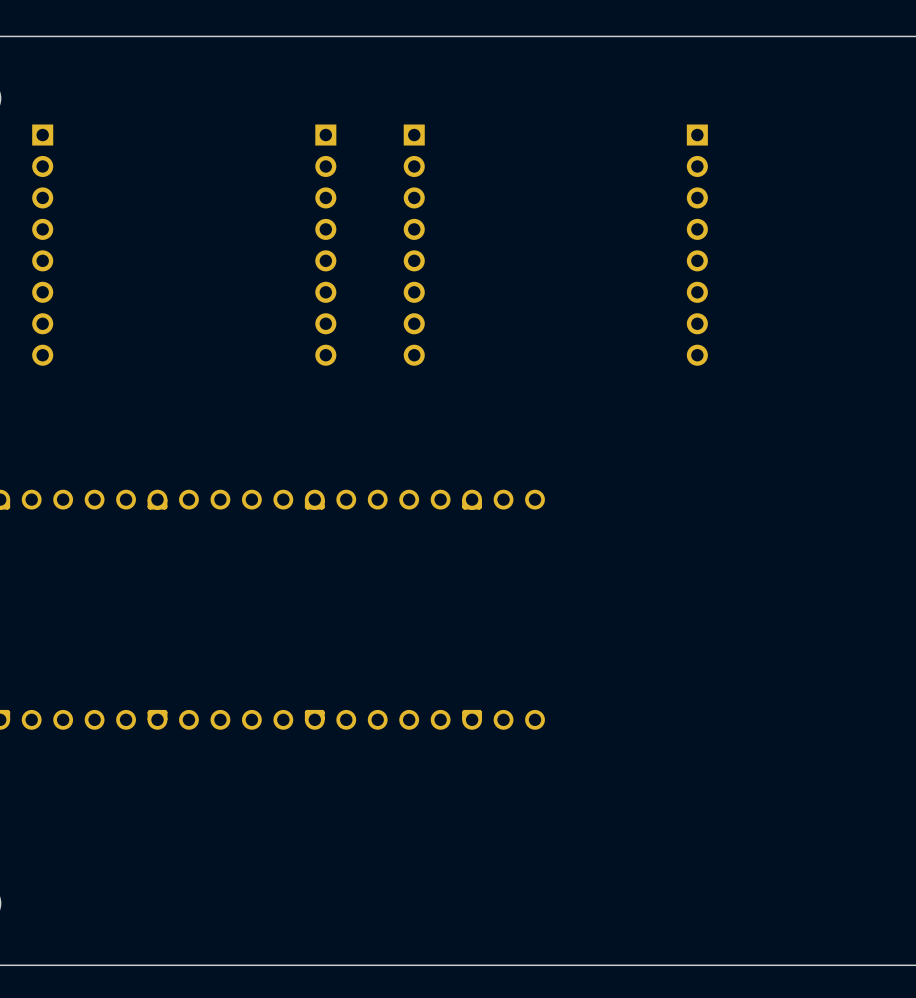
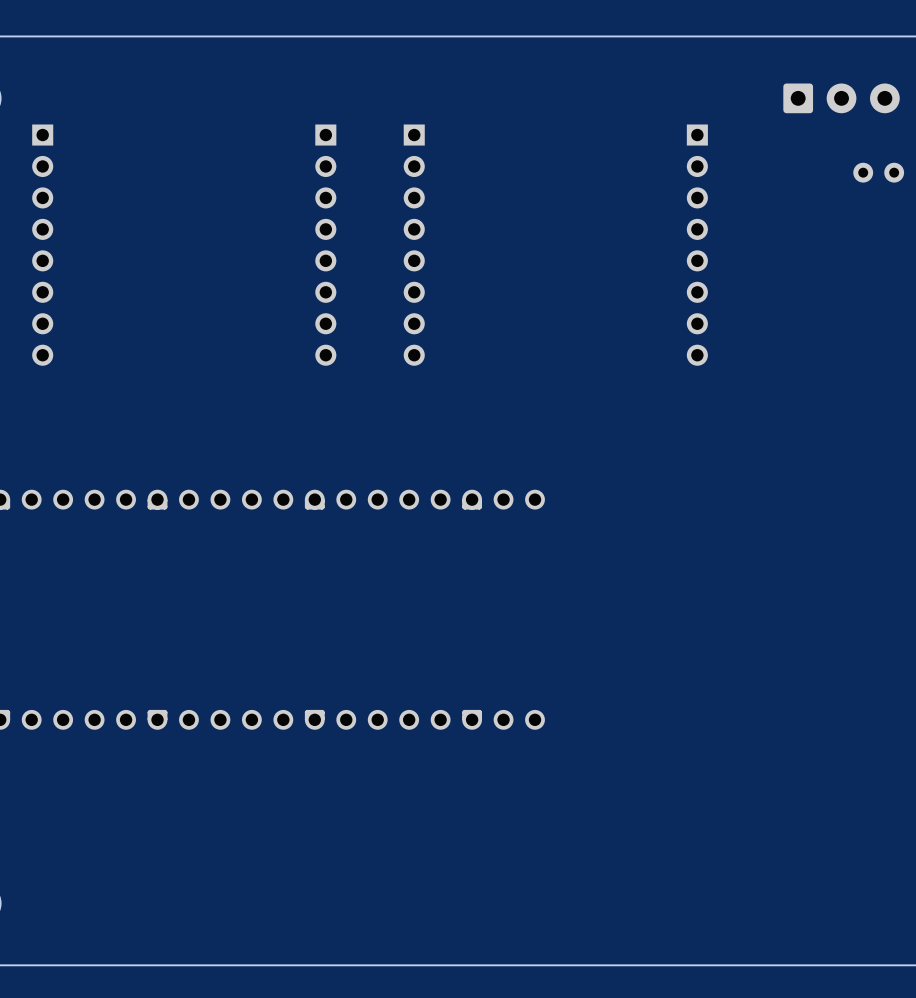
part: none -> (841, 98)
part: none -> (878, 172)

